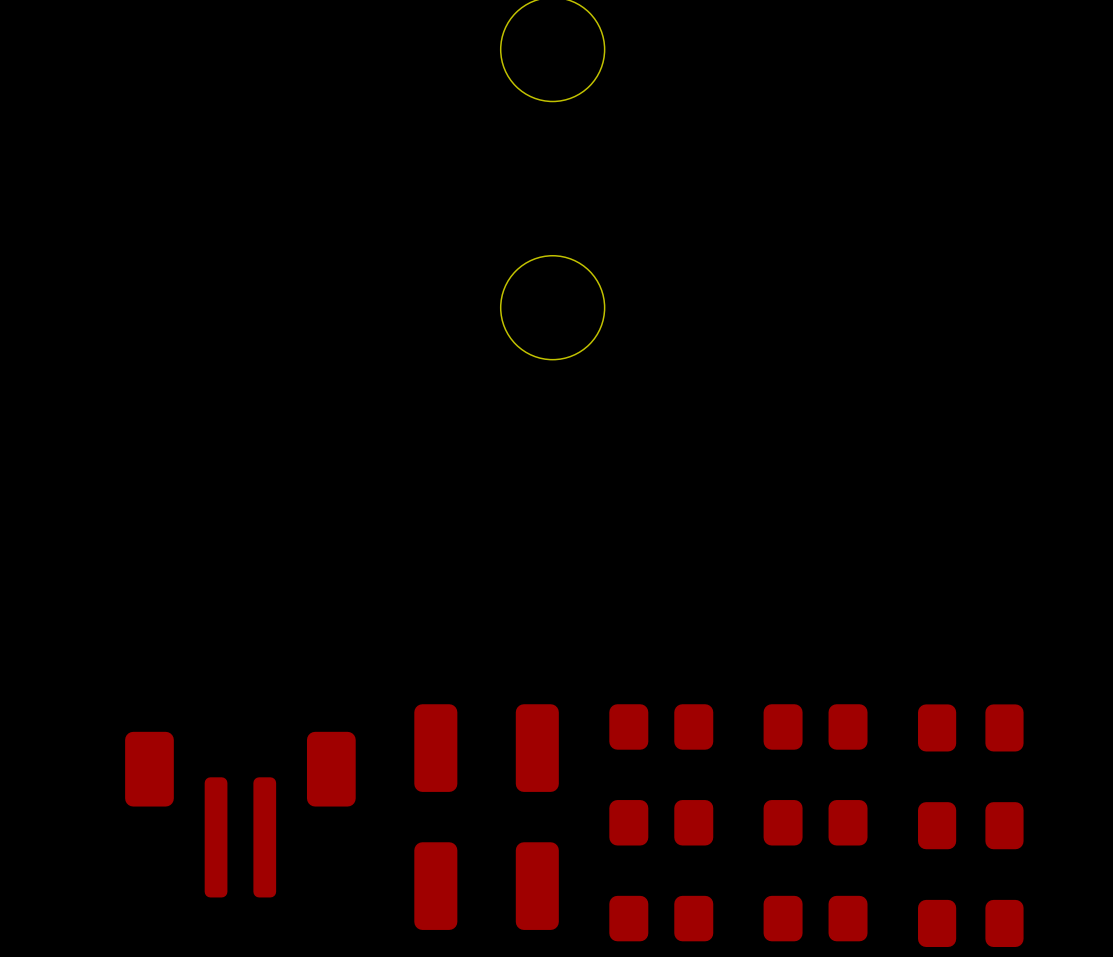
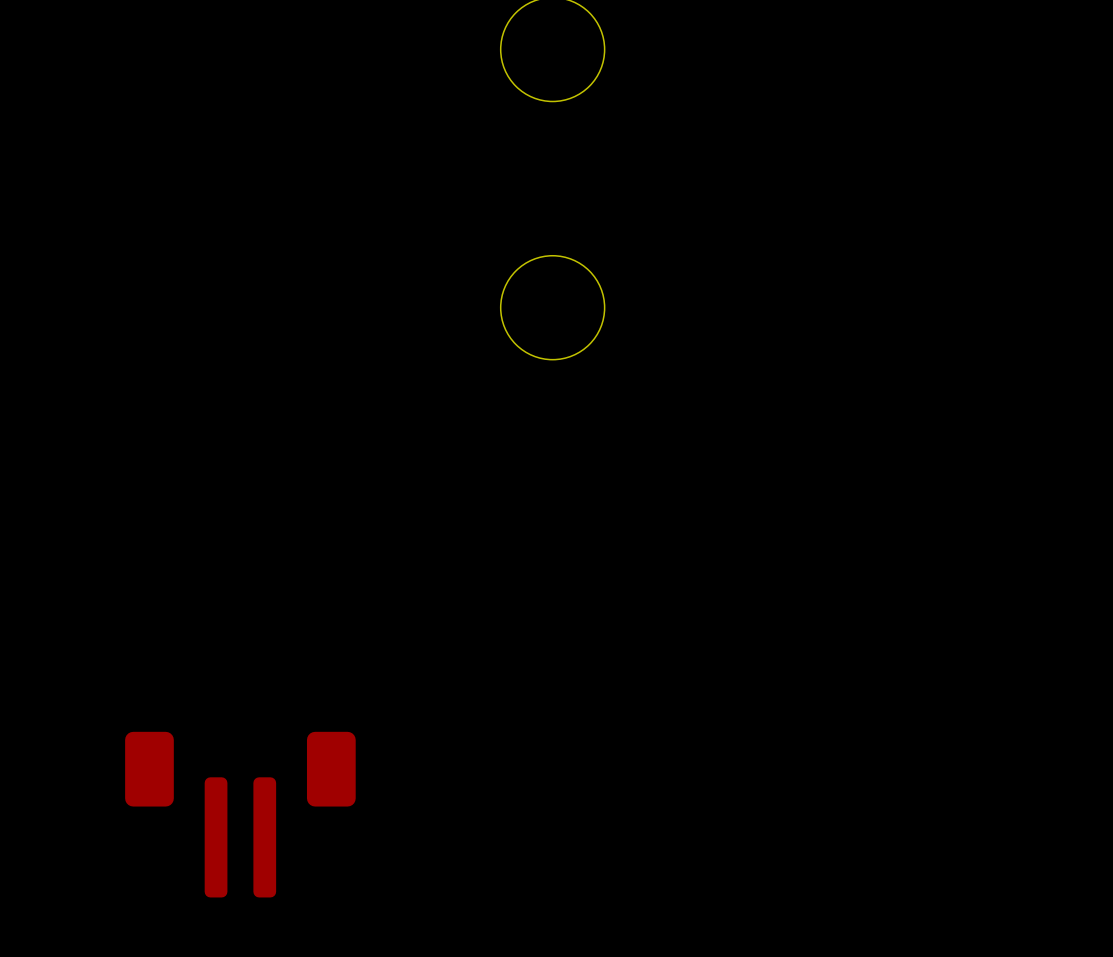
part: (661, 726) -> none
part: (815, 726) -> none
part: (970, 727) -> none
part: (486, 748) -> none
part: (661, 822) -> none
part: (815, 822) -> none
part: (970, 825) -> none
part: (486, 886) -> none
part: (661, 918) -> none
part: (815, 918) -> none
part: (970, 923) -> none

